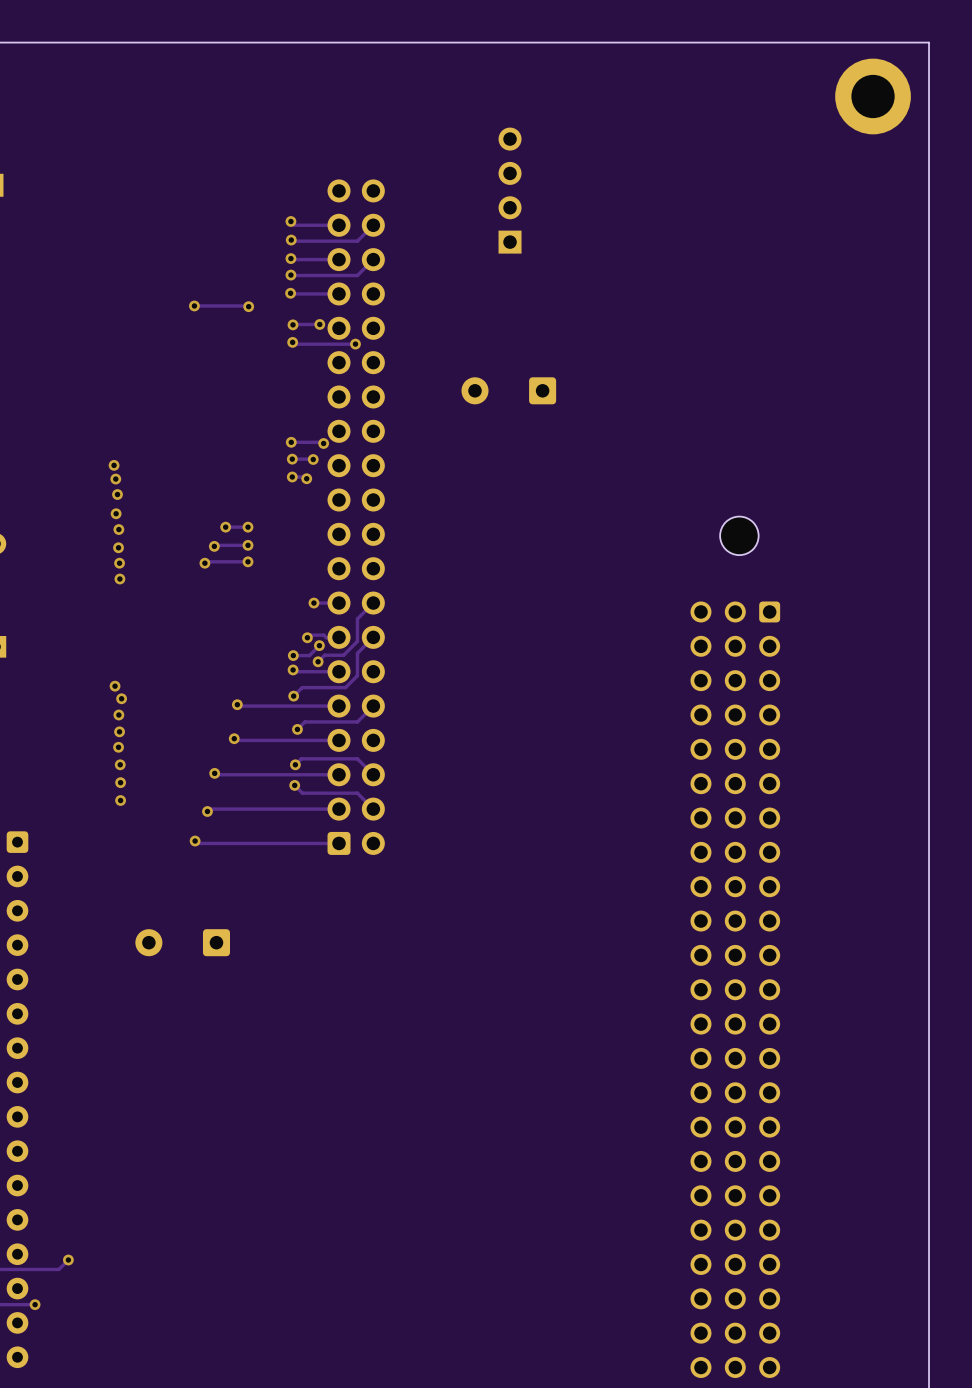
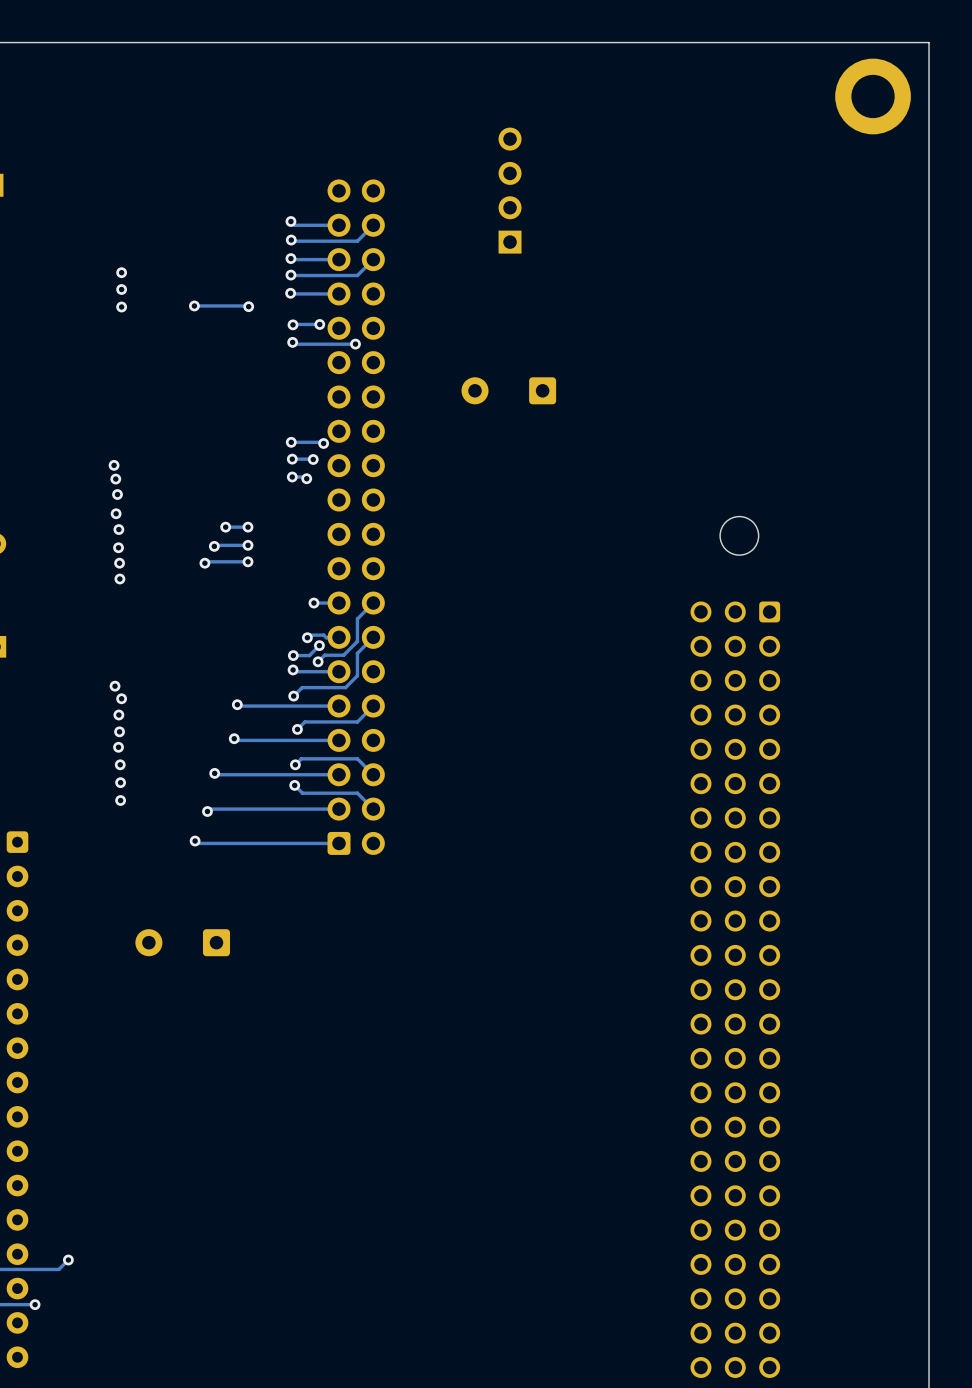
via: none -> (121, 272)
via: none -> (121, 289)
via: none -> (121, 307)

